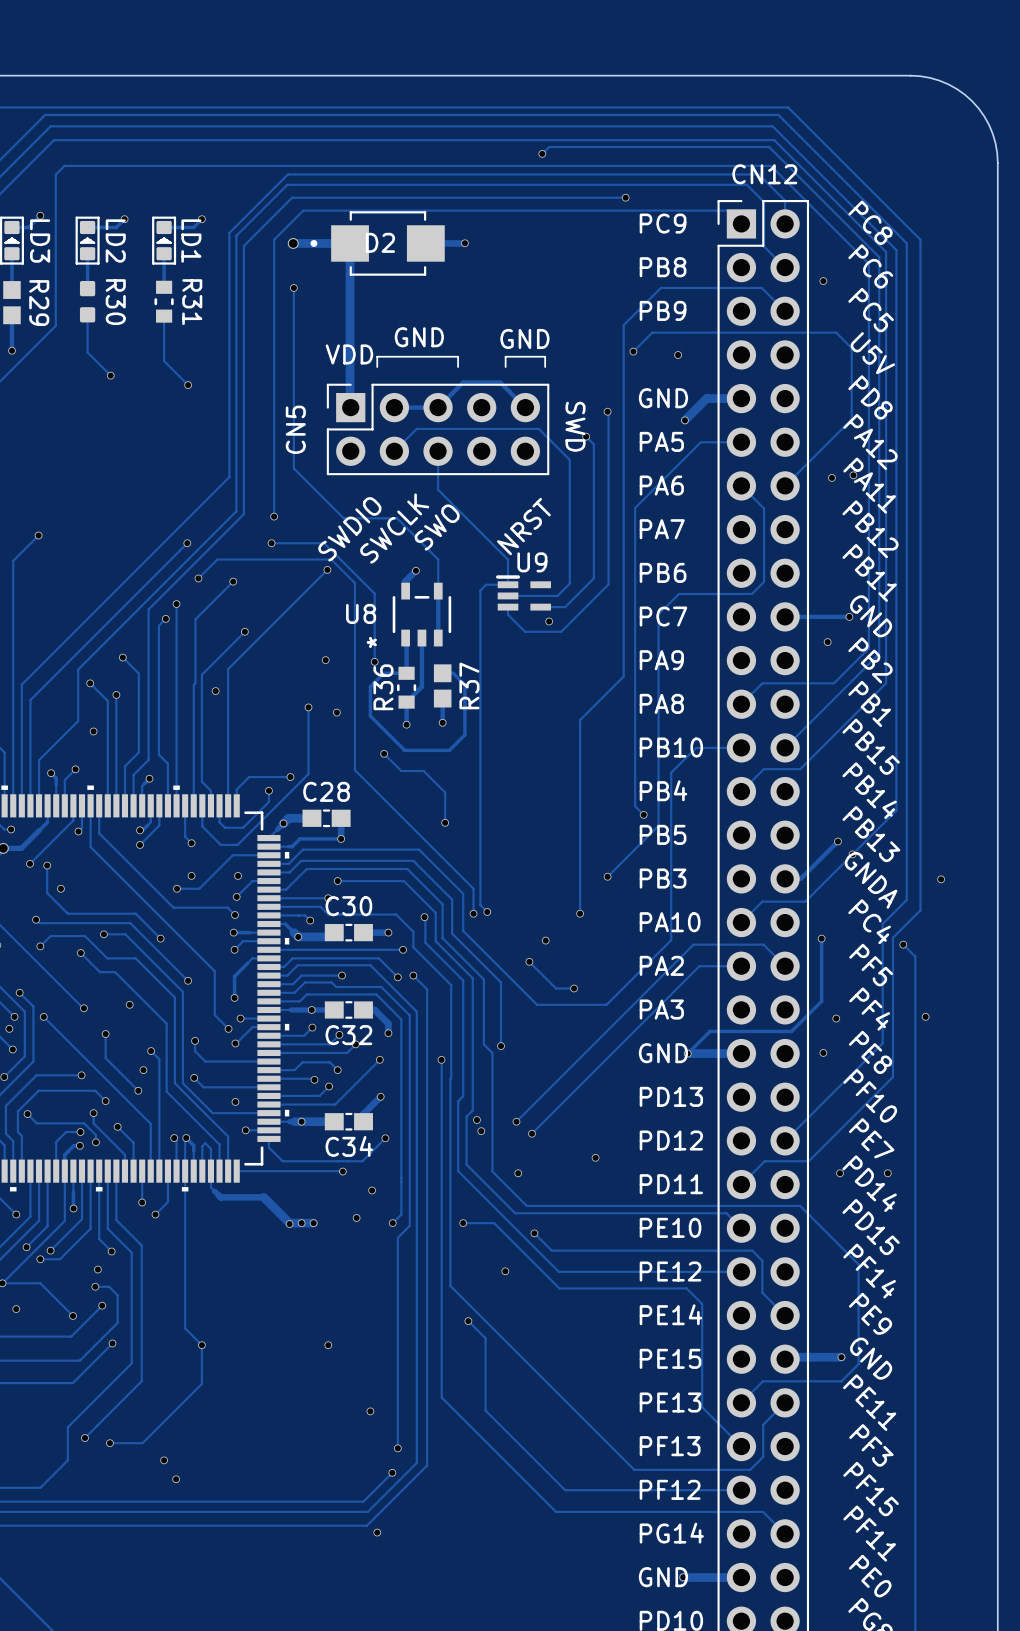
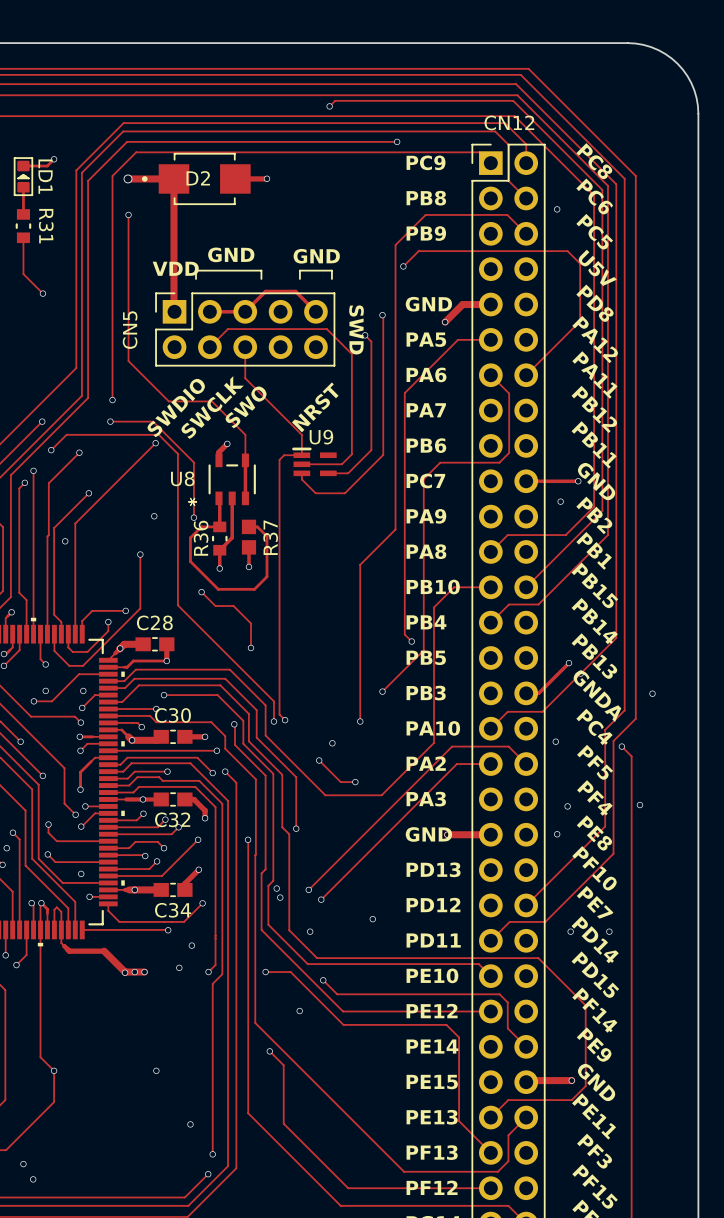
via: (678, 355) -> none
via: (853, 475) -> none
via: (831, 477) -> none
via: (549, 621) -> none
via: (336, 712) -> none
track: (821, 938) (821, 1001) (791, 1031) (709, 1031) (687, 1053) -> none

